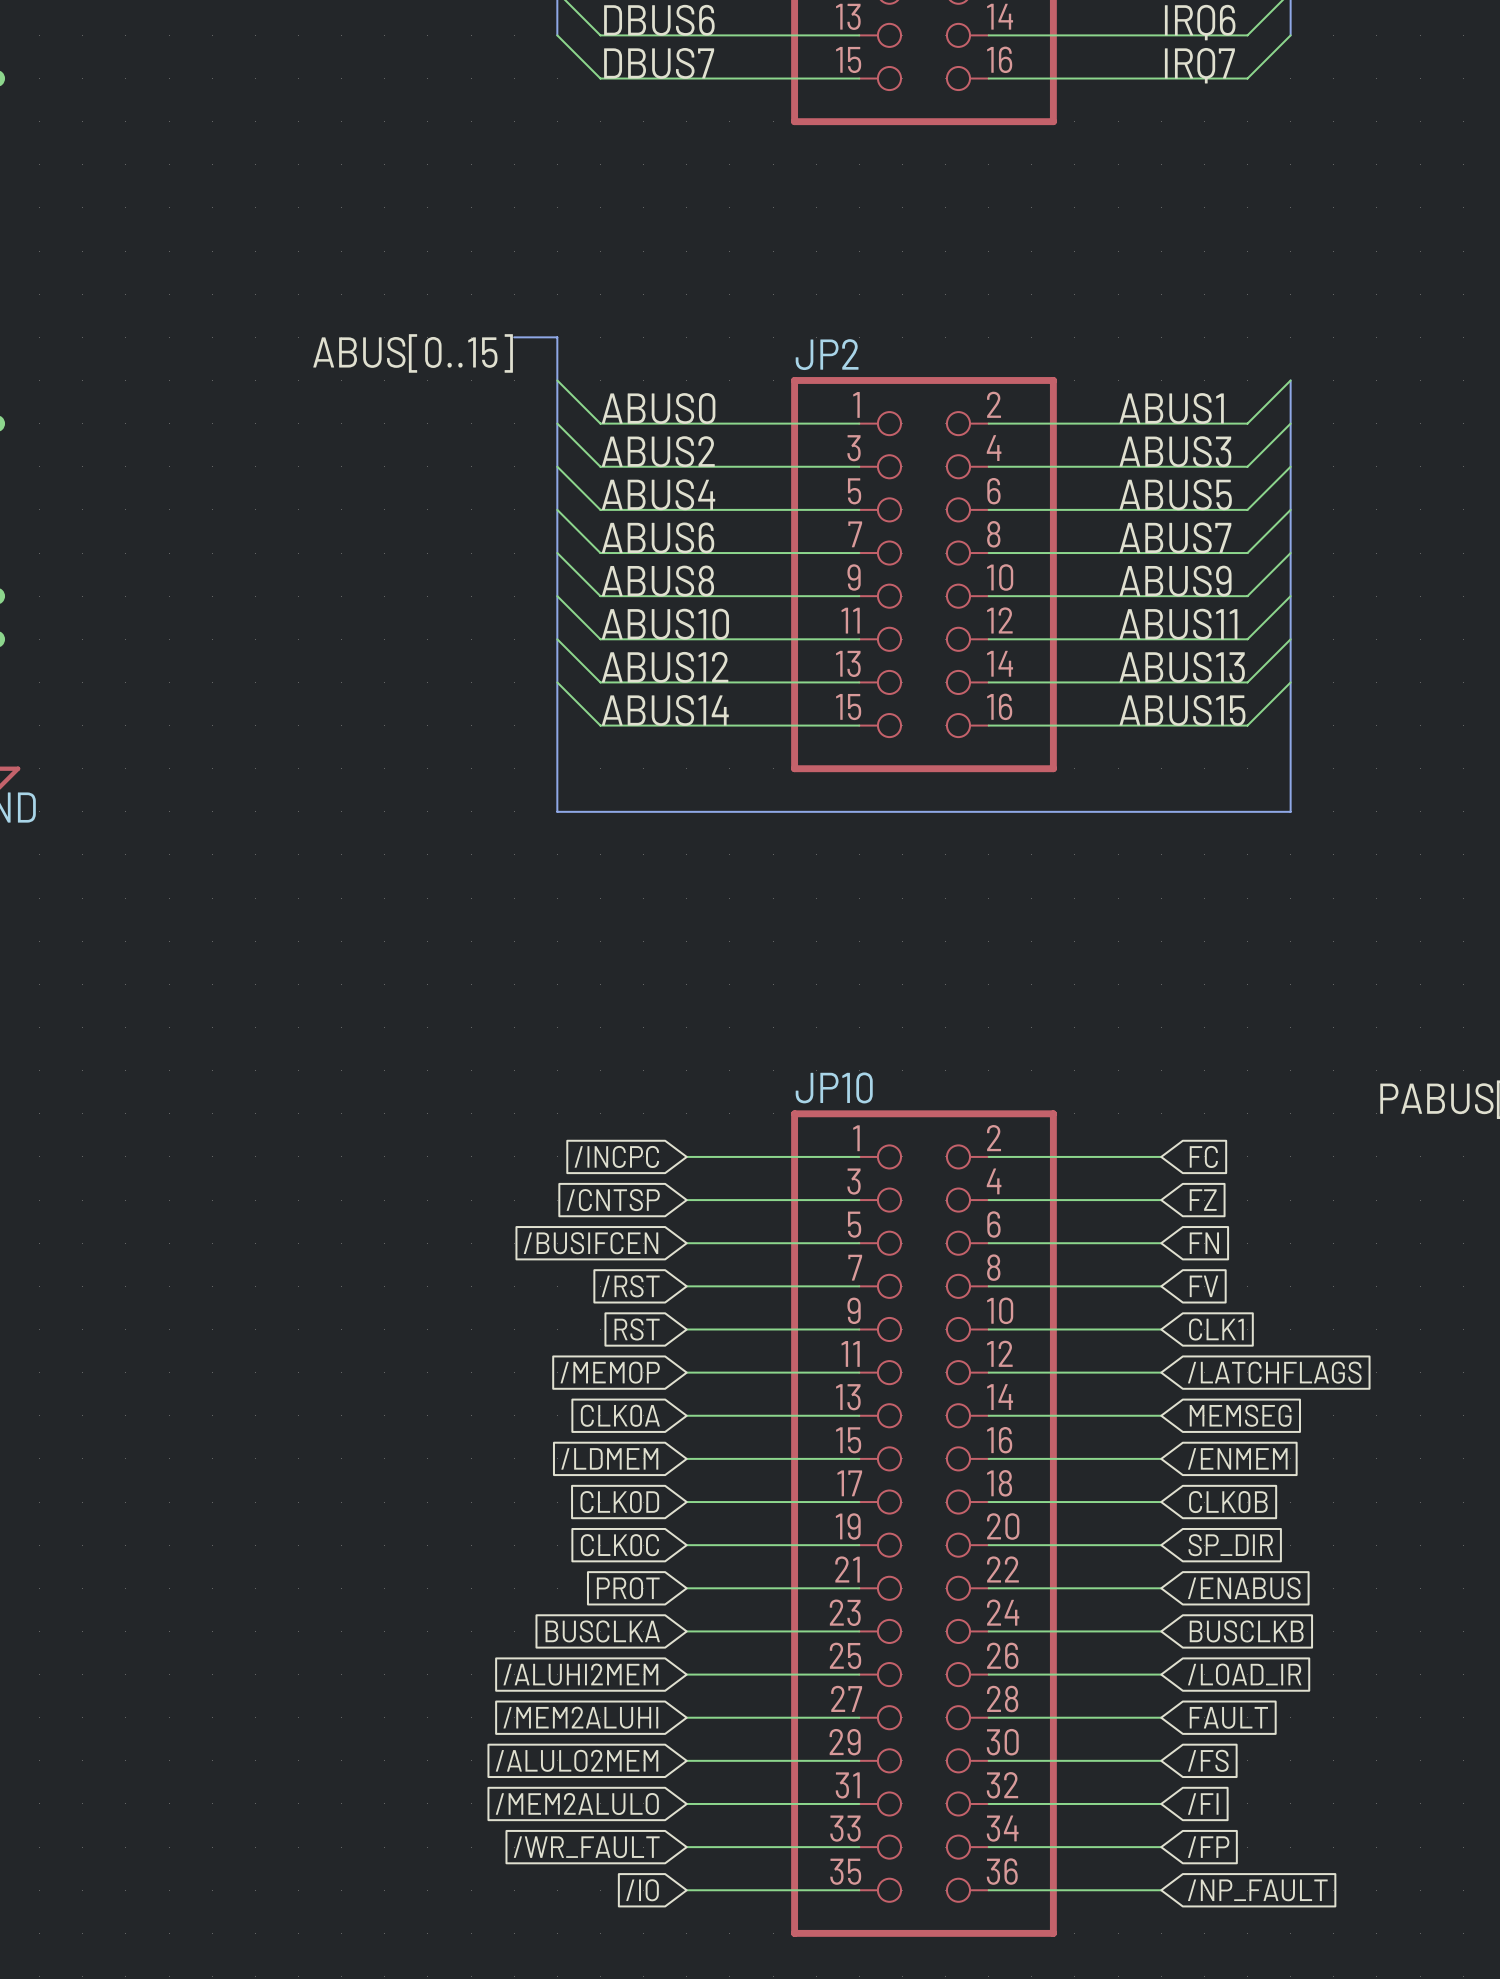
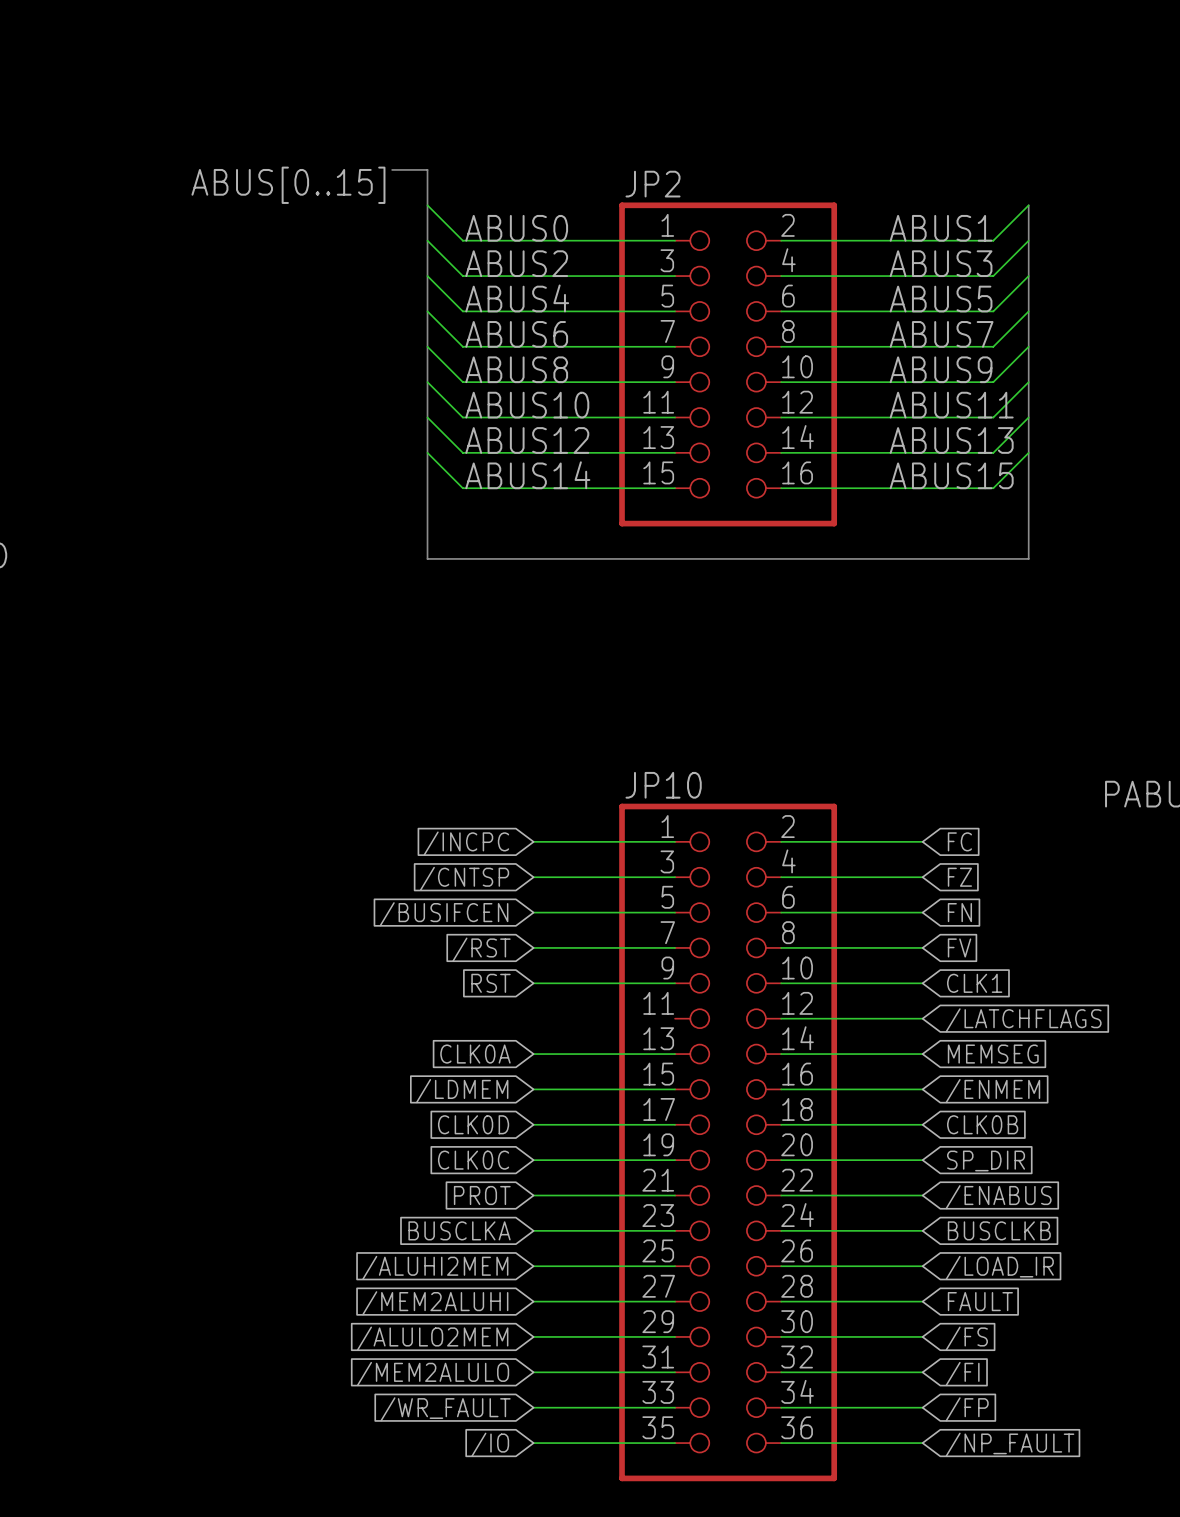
global label: /MEMOP (610, 1372) -> none
wire: (686, 1372) (859, 1372) -> none

